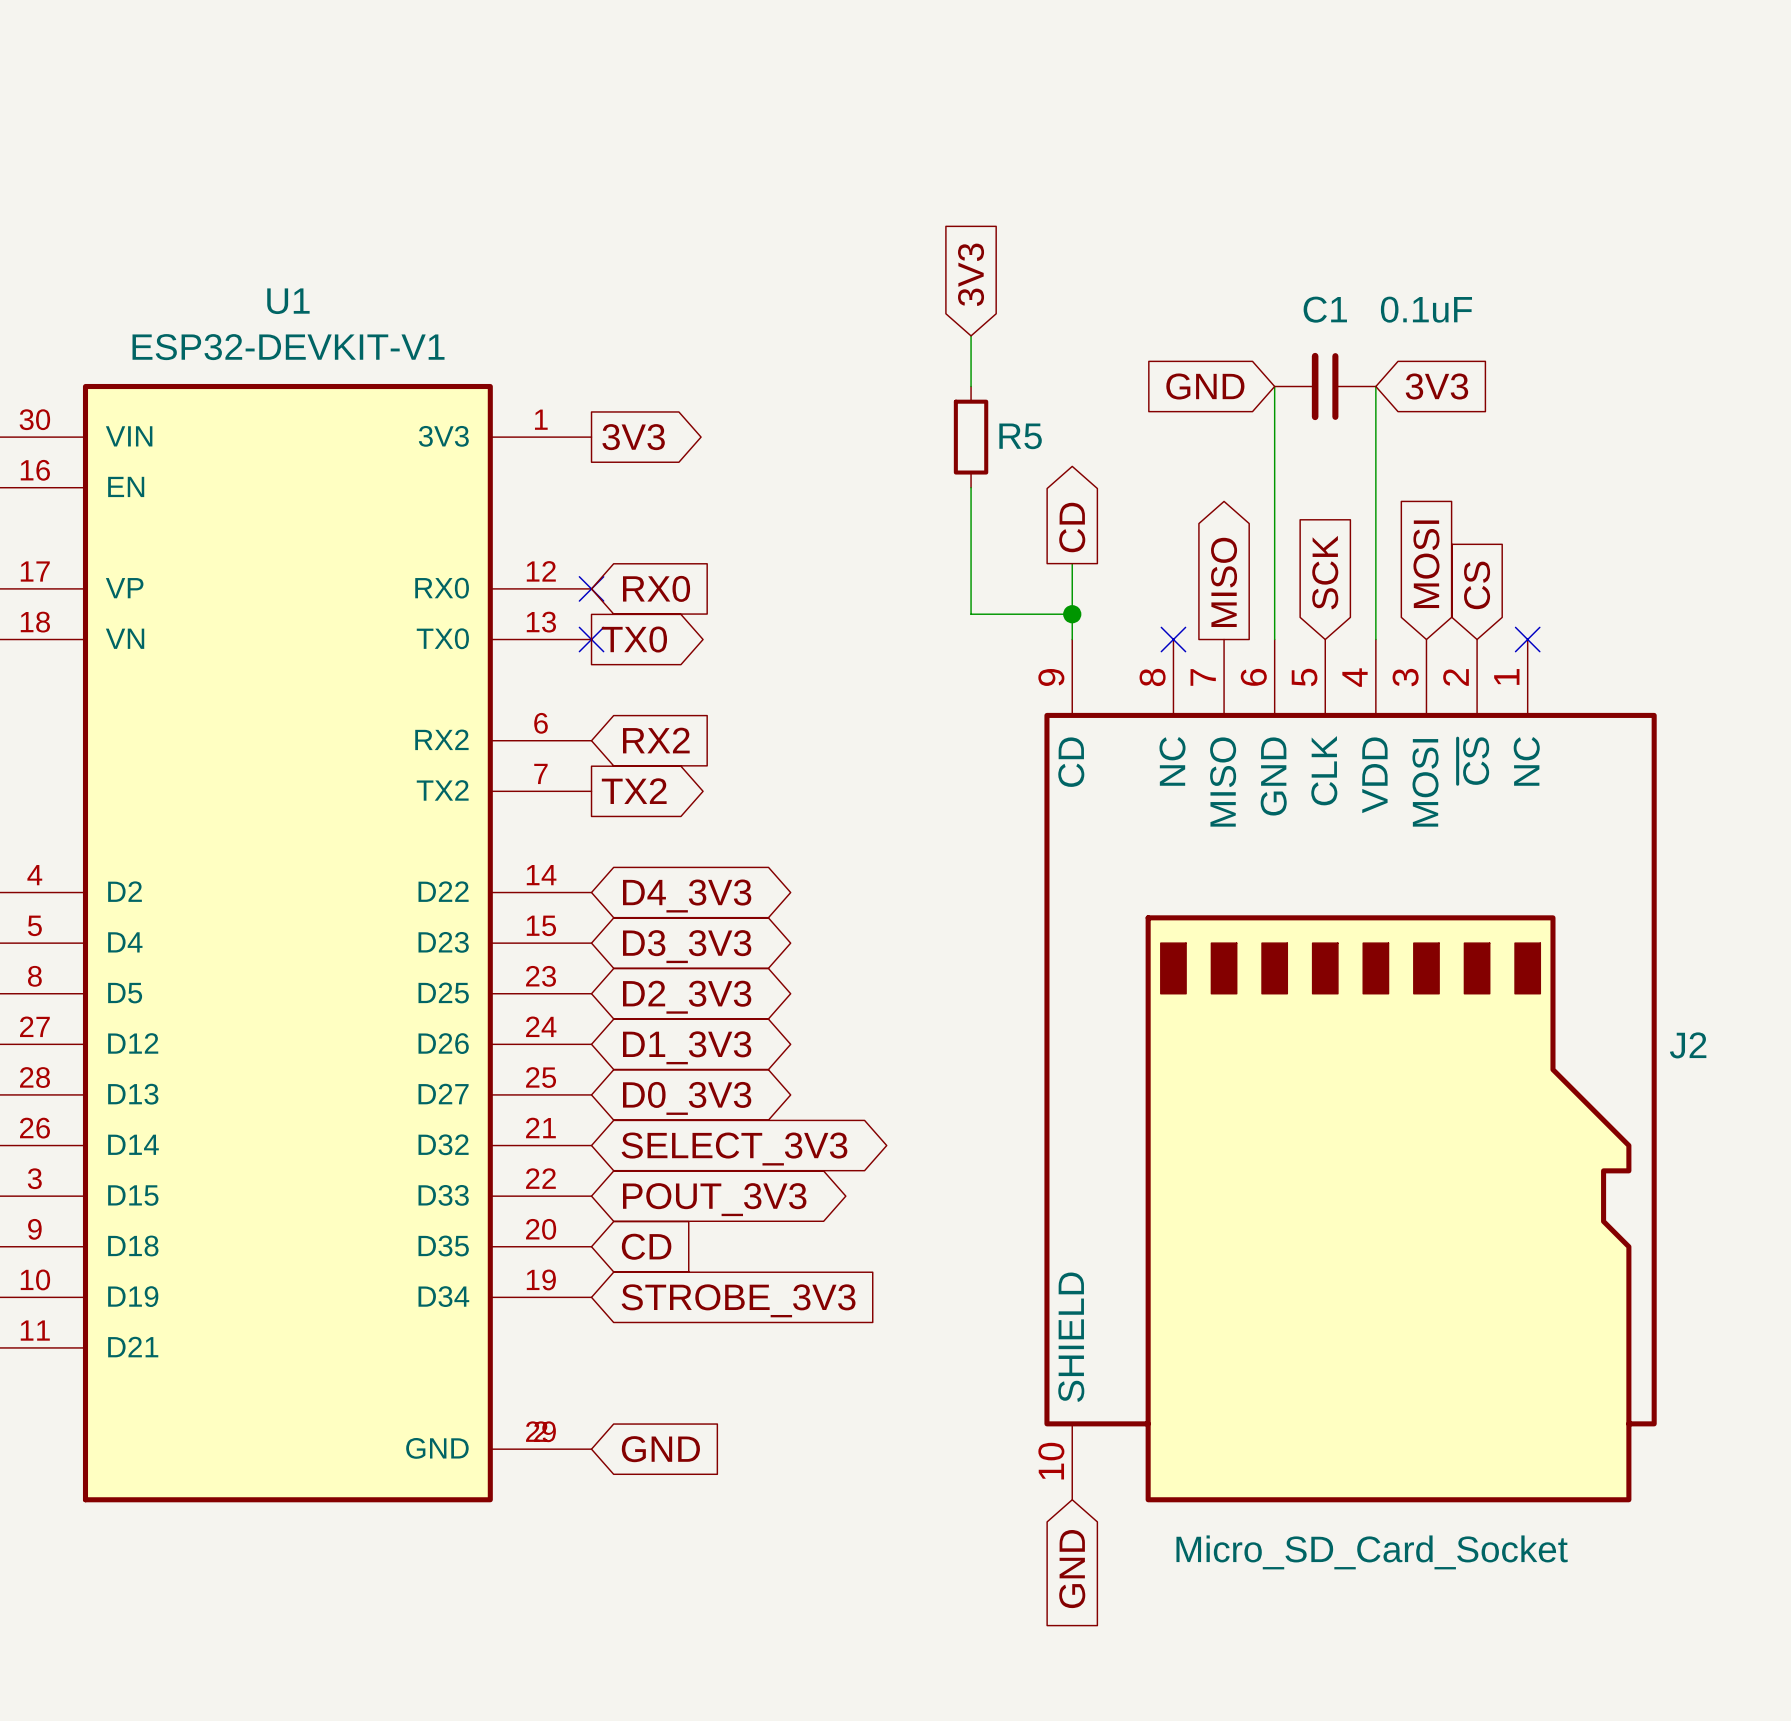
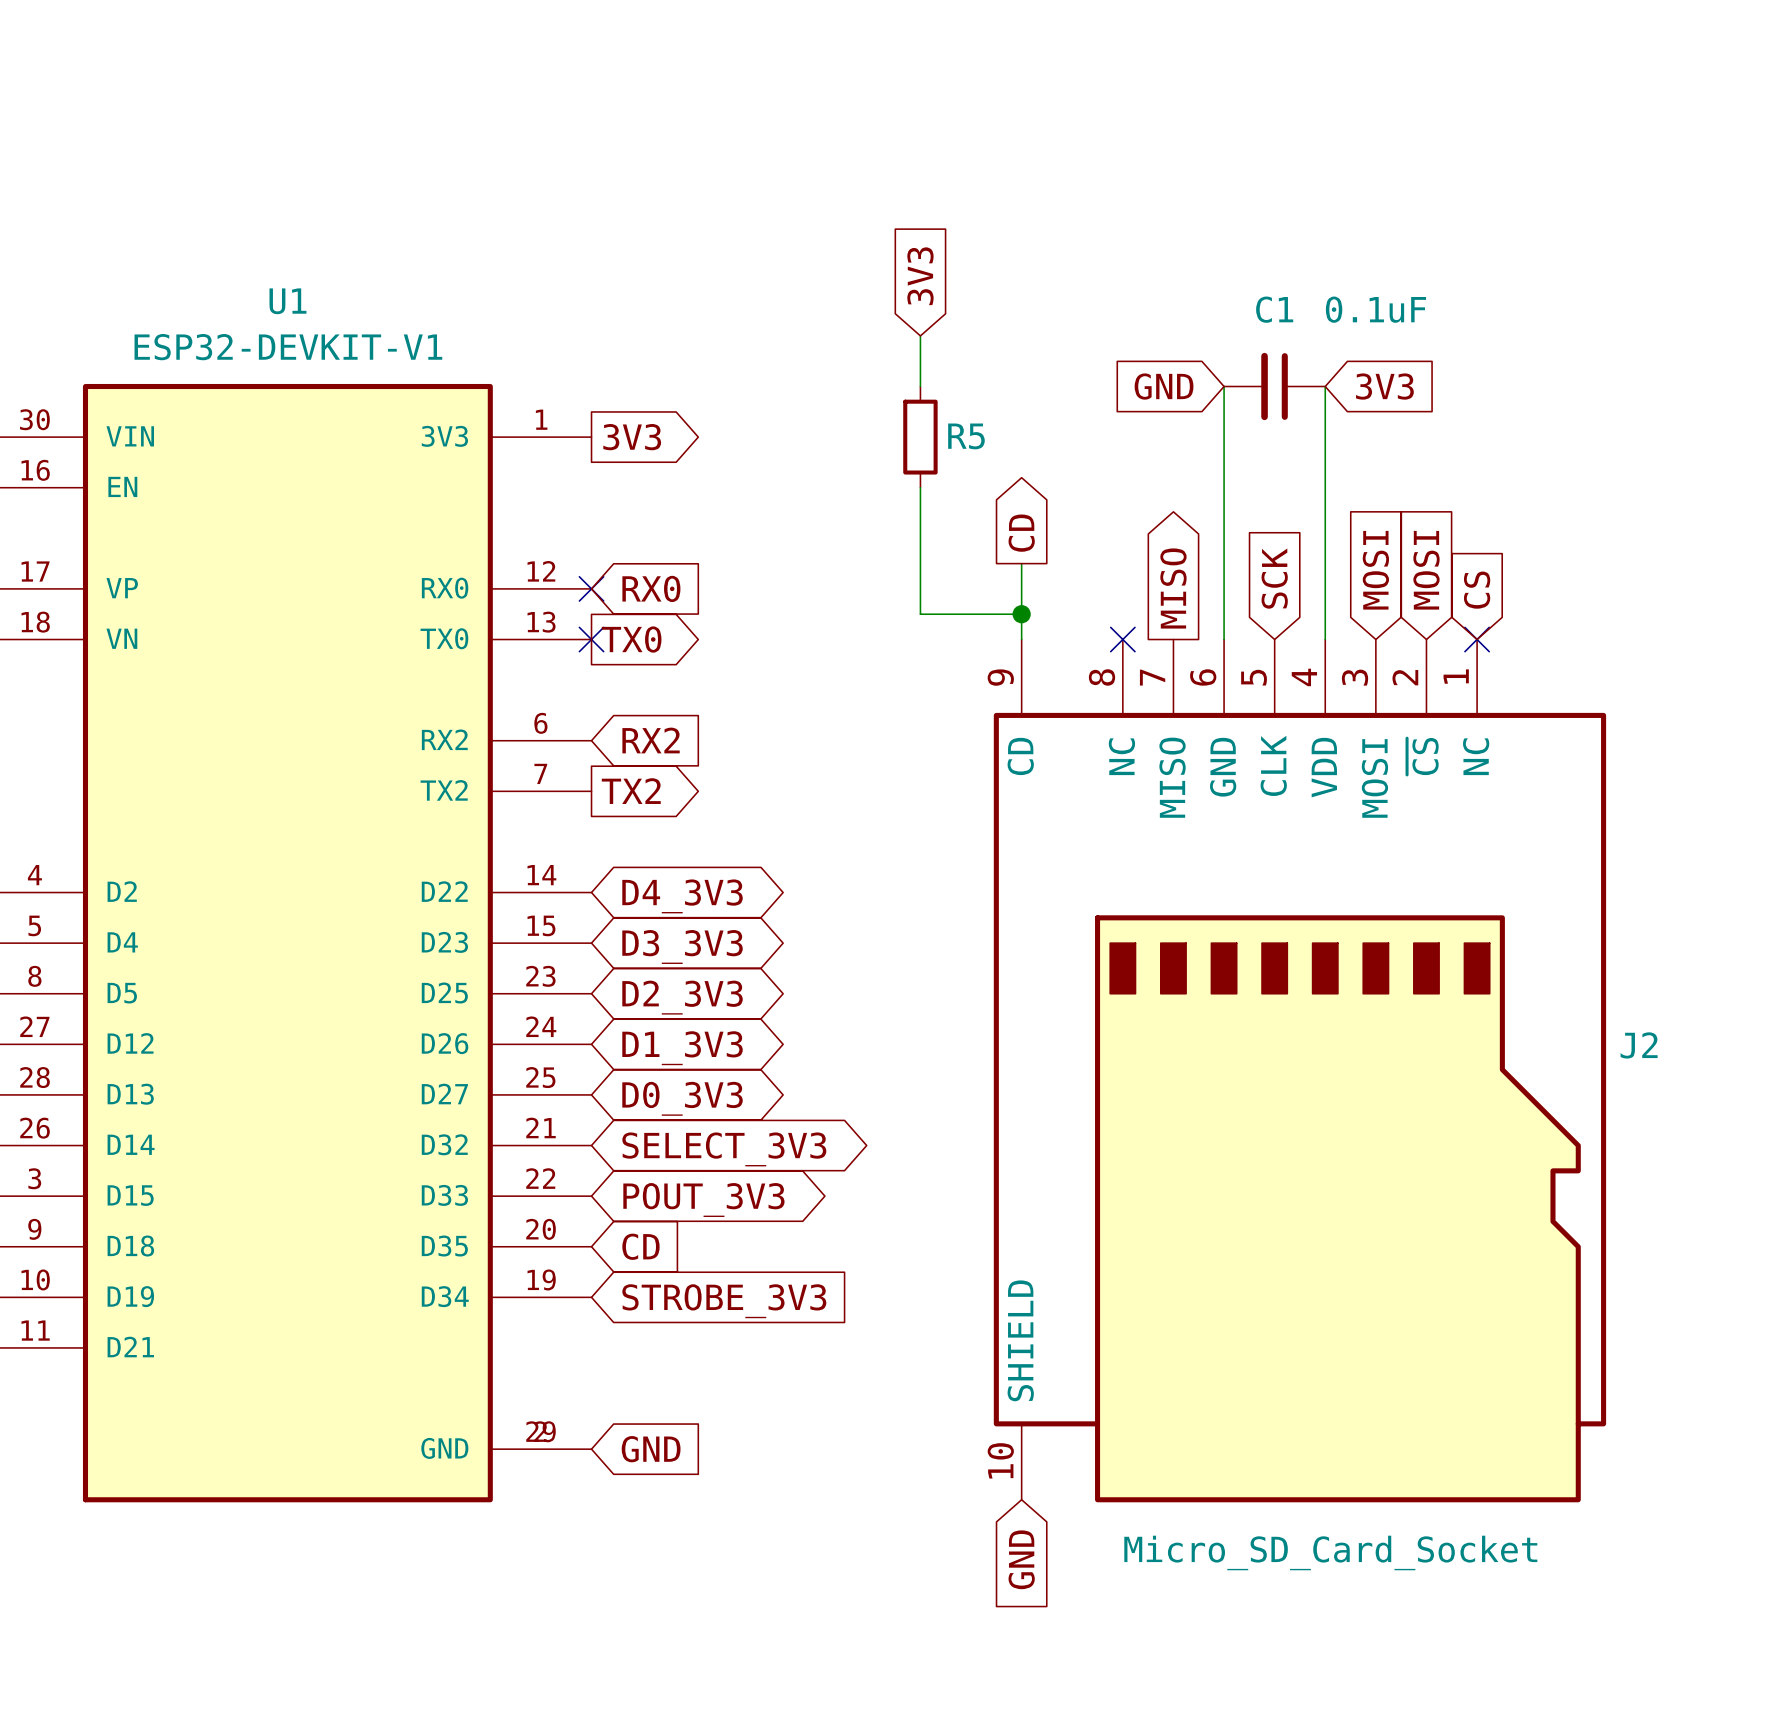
global label position: 3V3 (971, 274) -> 3V3 (920, 276)
wire: (971, 335) (971, 386) -> (920, 335) (920, 386)
global label position: GND (1205, 386) -> GND (1164, 386)
wire: (1274, 386) (1274, 639) -> (1224, 386) (1224, 639)
C1 position: (1325, 386) -> (1274, 386)
wire: (1375, 386) (1375, 639) -> (1325, 386) (1325, 639)
global label position: 3V3 (1436, 386) -> 3V3 (1384, 386)
R5 position: (971, 437) -> (920, 437)
wire: (971, 487) (971, 614) -> (920, 487) (920, 614) (971, 614)
global label position: CD (1072, 527) -> CD (1021, 533)
wire: (1072, 563) (1072, 639) -> (1021, 563) (1021, 639)
global label: none -> MOSI (1375, 570)
global label position: SCK (1325, 572) -> SCK (1274, 578)
global label position: MISO (1224, 582) -> MISO (1173, 588)
wire: (1021, 614) (1072, 614) -> none
junction position: (1072, 614) -> (1021, 614)
no-connect mark position: (1173, 639) -> (1122, 639)
no-connect mark position: (1527, 639) -> (1477, 639)
J2 position: (1350, 1070) -> (1299, 1070)
global label position: GND (1072, 1569) -> GND (1021, 1559)

